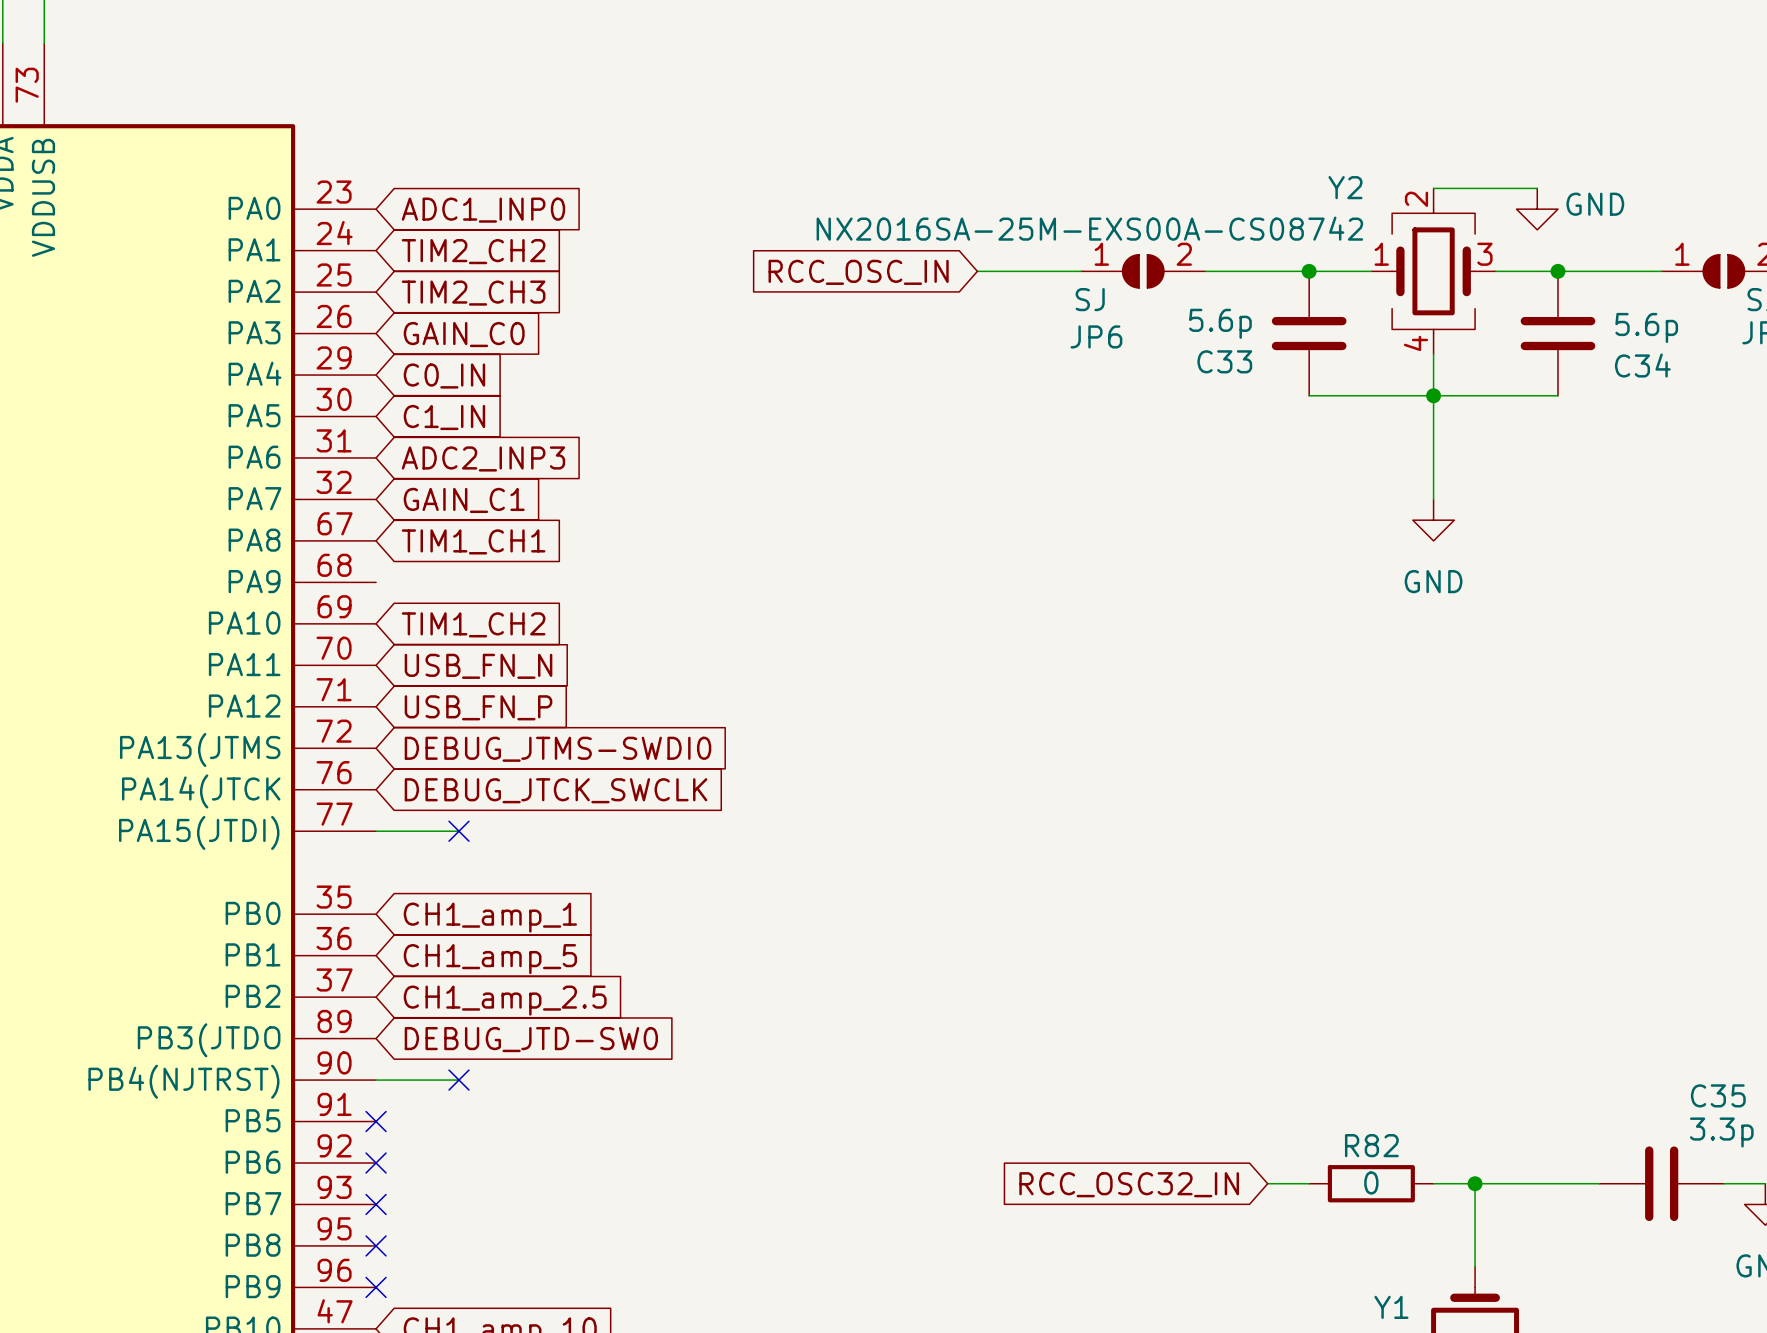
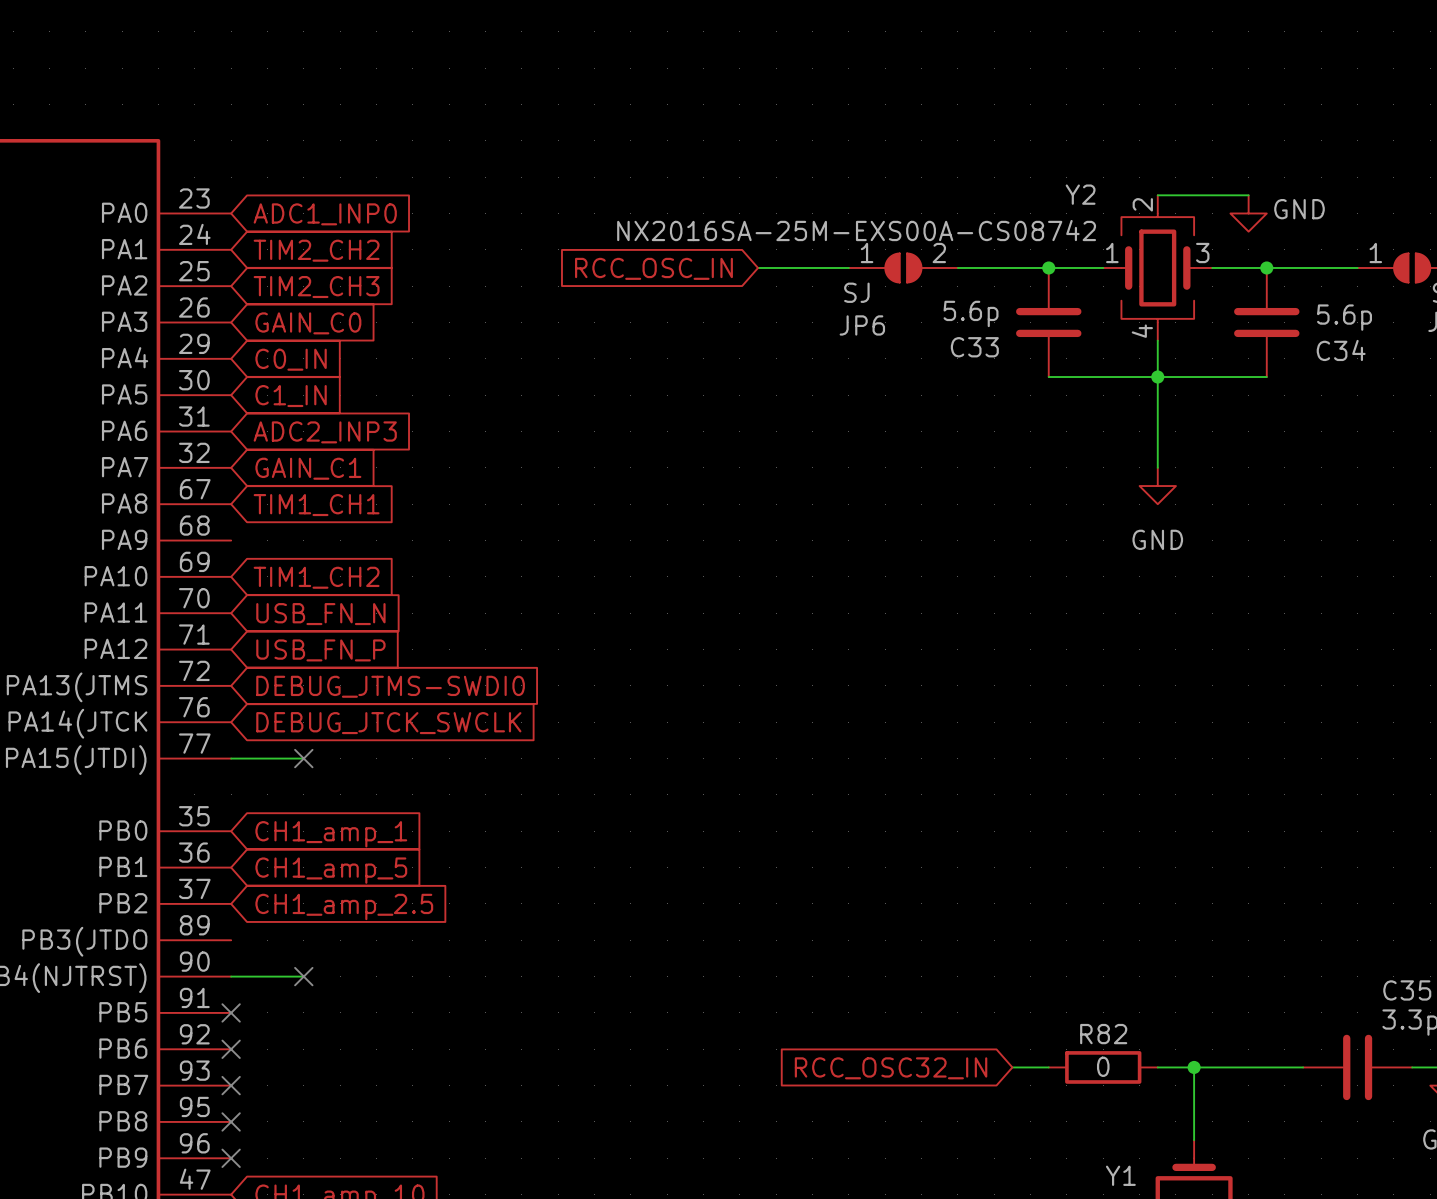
global label: DEBUG_JTD-SW0 (531, 1039) -> none

